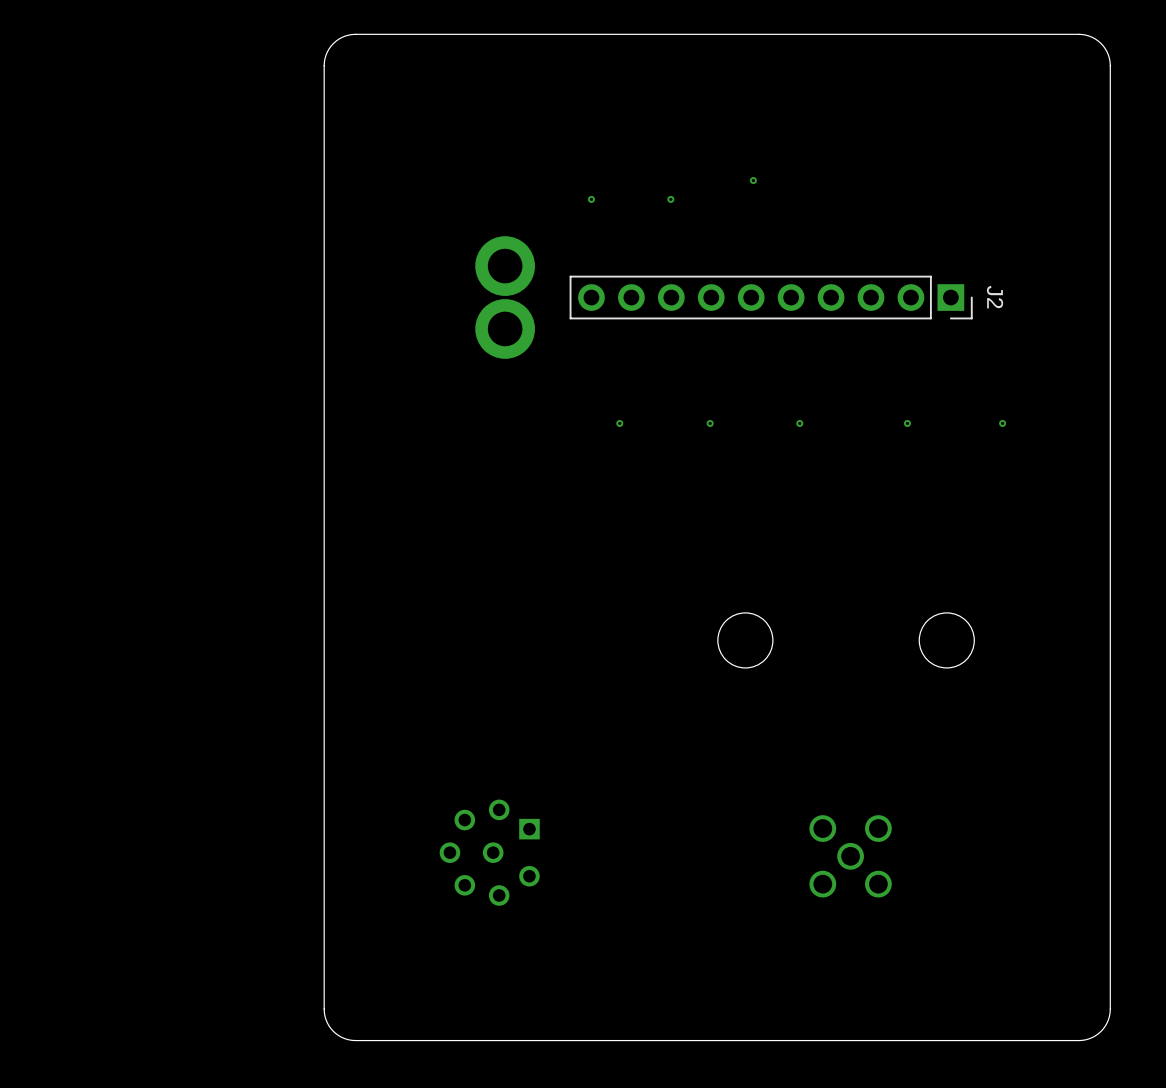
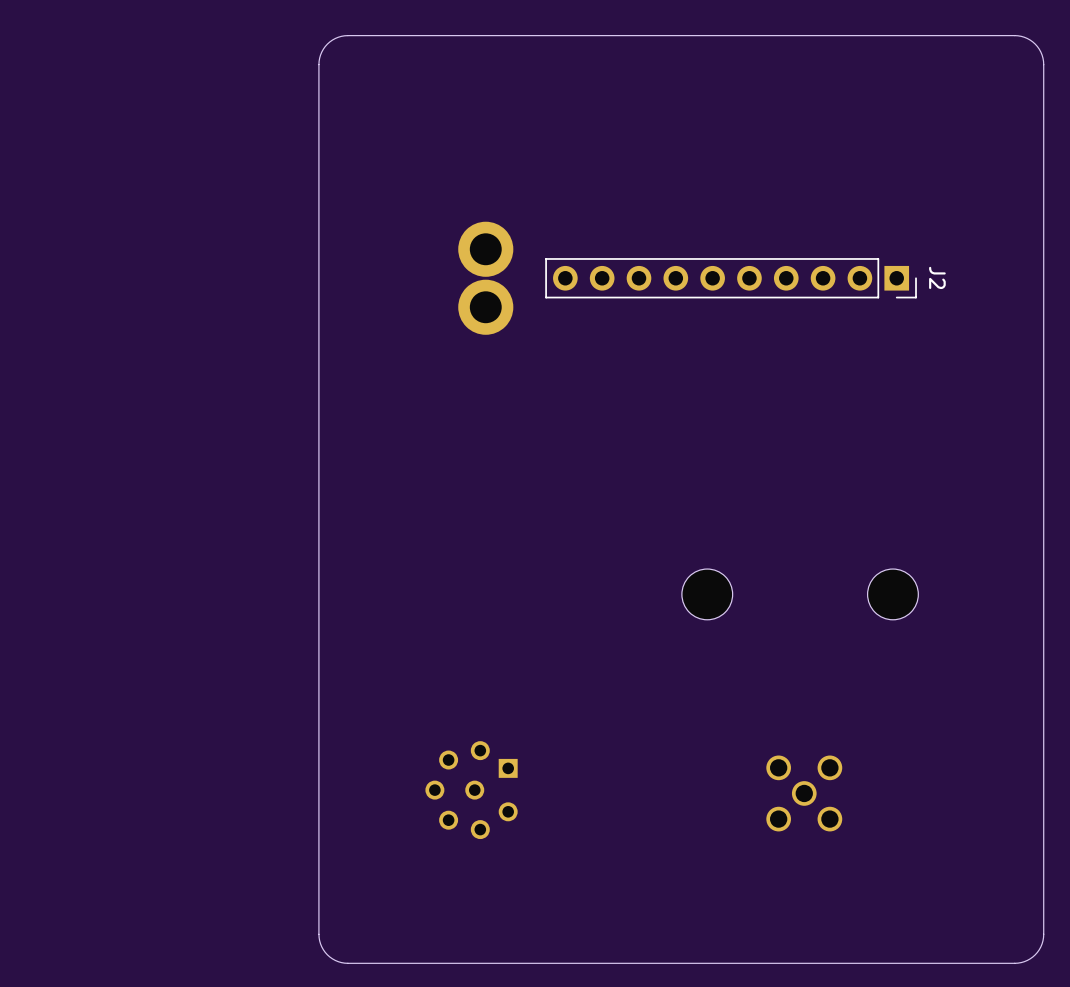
via: (753, 180) -> none
via: (591, 199) -> none
via: (670, 199) -> none
via: (619, 423) -> none
via: (710, 423) -> none
via: (799, 423) -> none
via: (907, 423) -> none
via: (1002, 423) -> none

